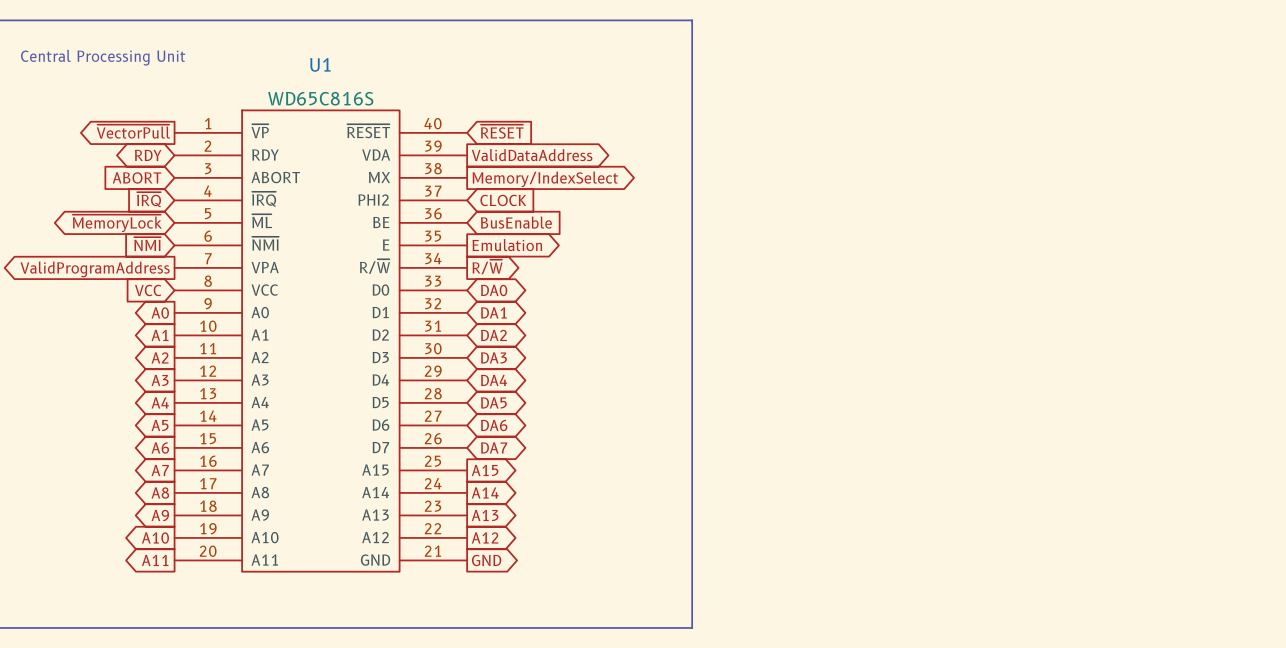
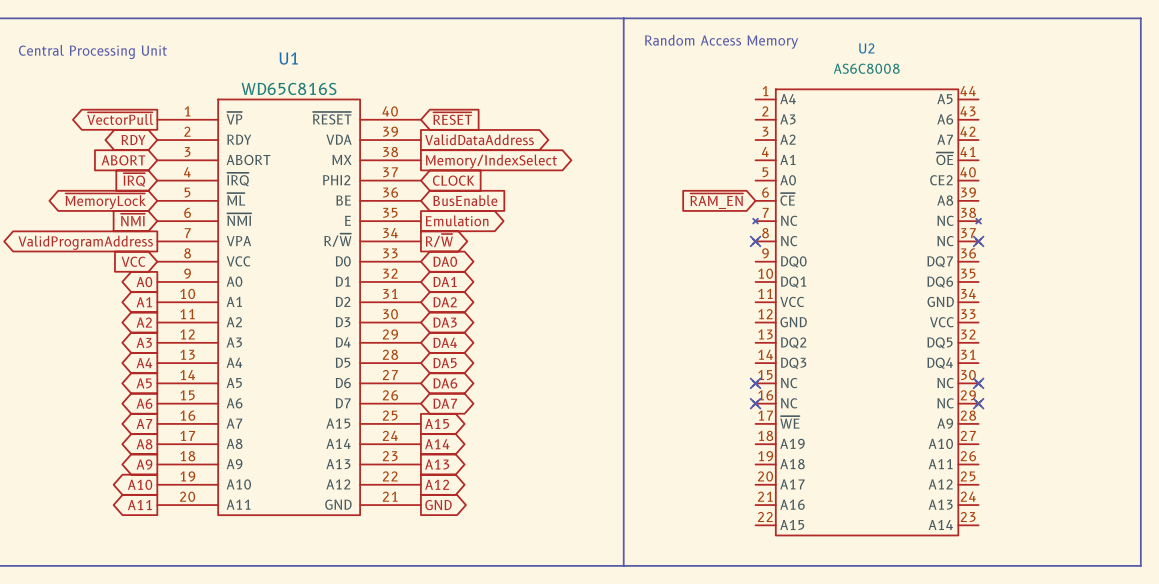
line: none -> (623, 18) (1140, 18) (1140, 565) (623, 565)
text: none -> Random Access Memory (721, 41)
global label: none -> ~{RAM_EN} (716, 201)
no-connect mark: none -> (755, 241)
no-connect mark: none -> (978, 241)
U2: none -> AS6C8008 (867, 312)
no-connect mark: none -> (755, 383)
no-connect mark: none -> (978, 383)
no-connect mark: none -> (755, 403)
no-connect mark: none -> (978, 403)

